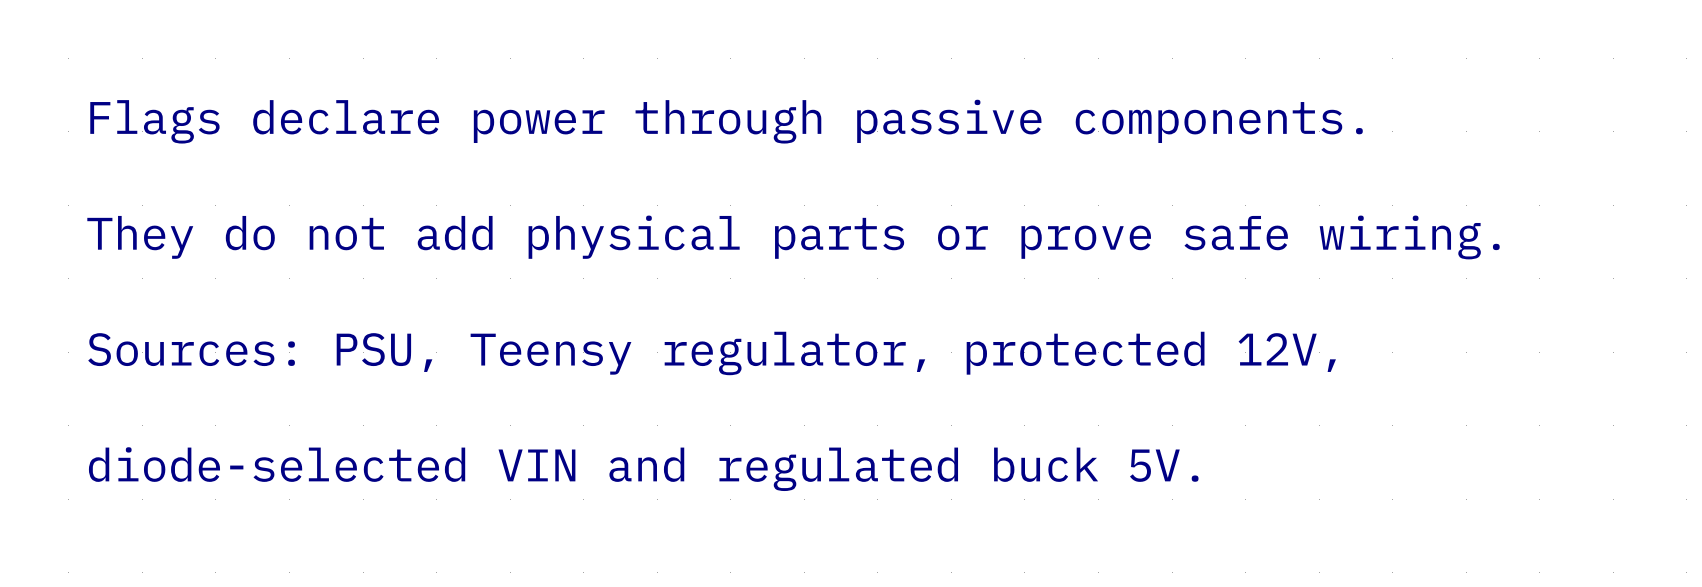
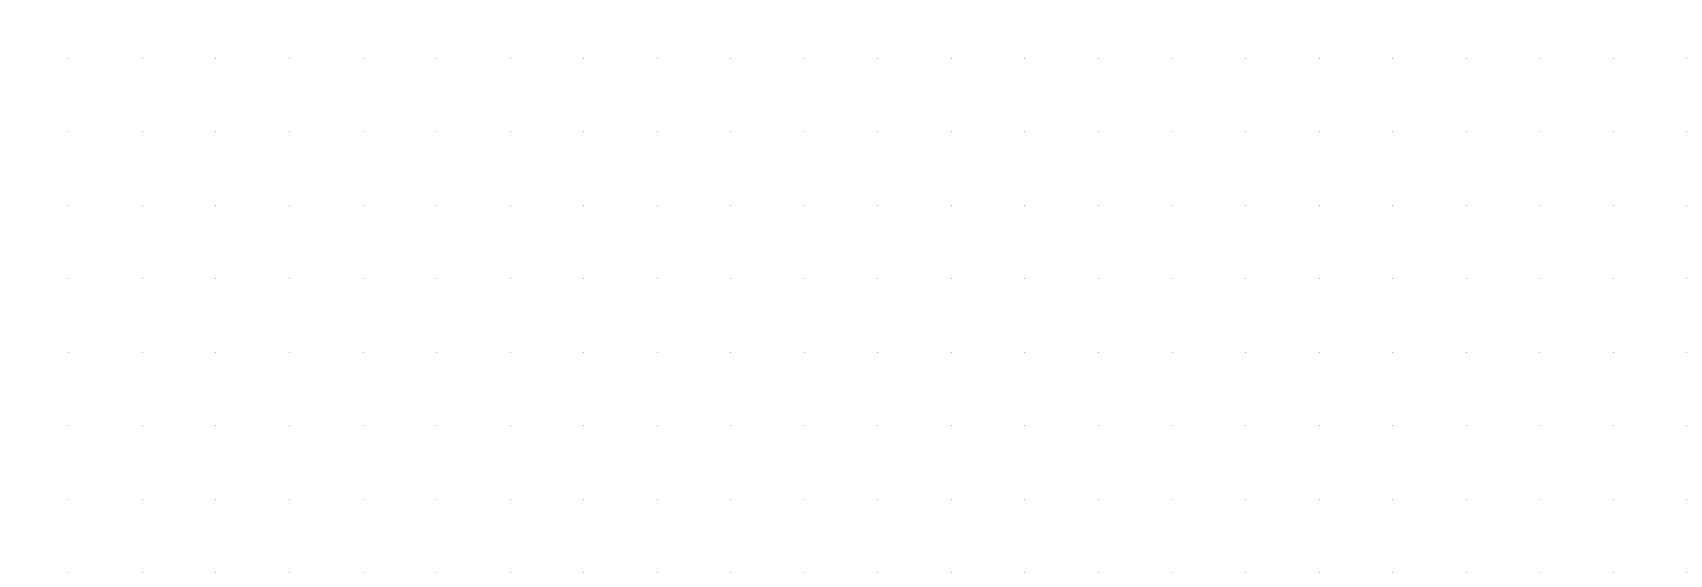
text: Flags declare power through passive components. (726, 121) -> none
text: They do not add physical parts or prove safe wiring. (793, 237) -> none
text: Sources: PSU, Teensy regulator, protected 12V, (712, 353) -> none
text: diode-selected VIN and regulated buck 5V. (643, 469) -> none

